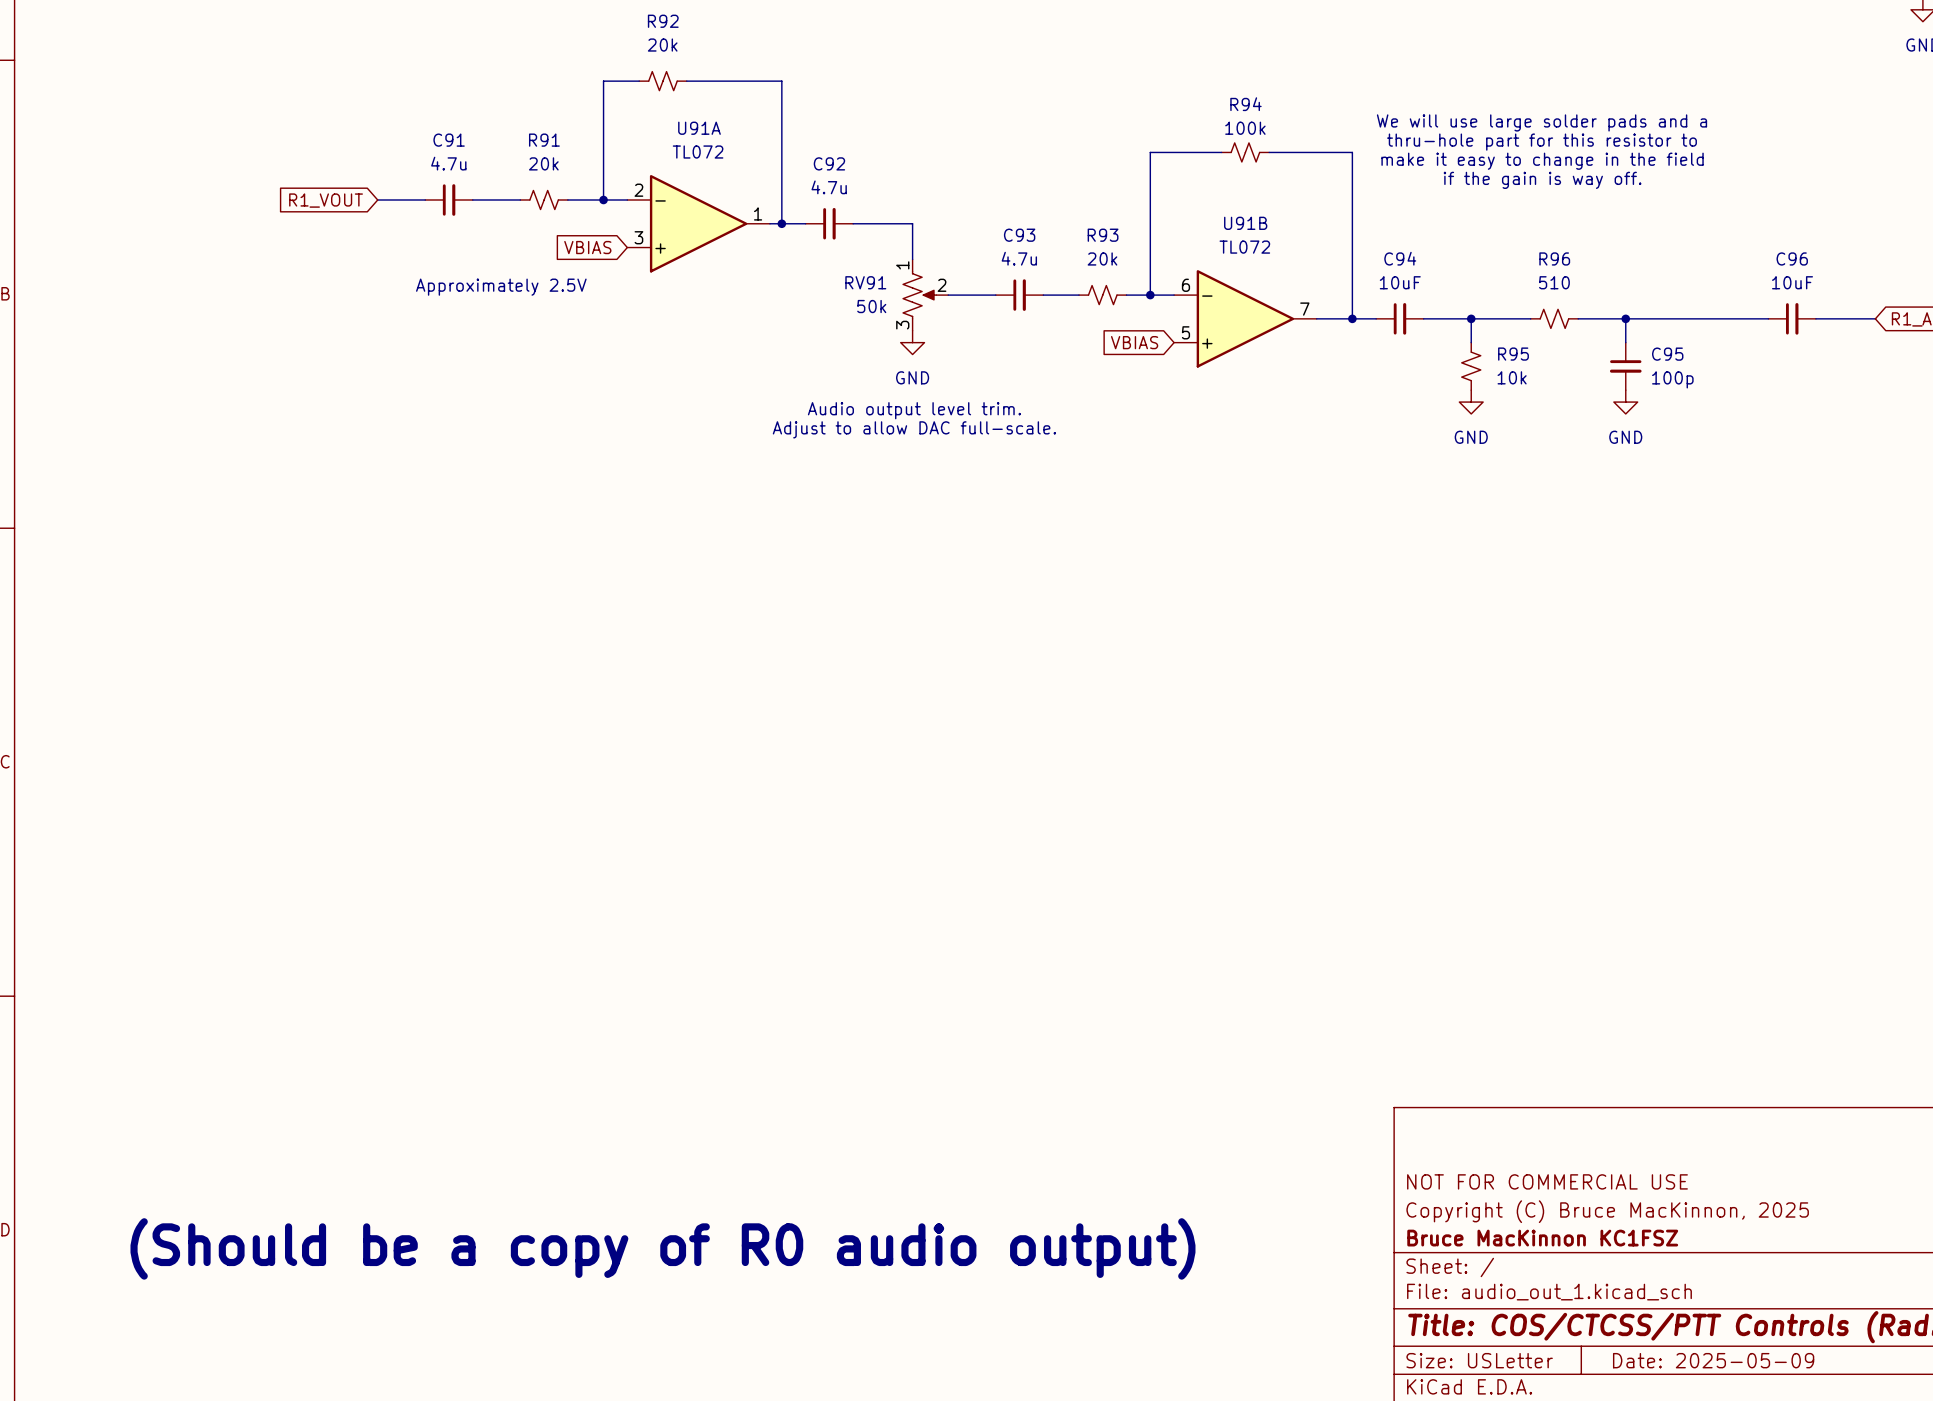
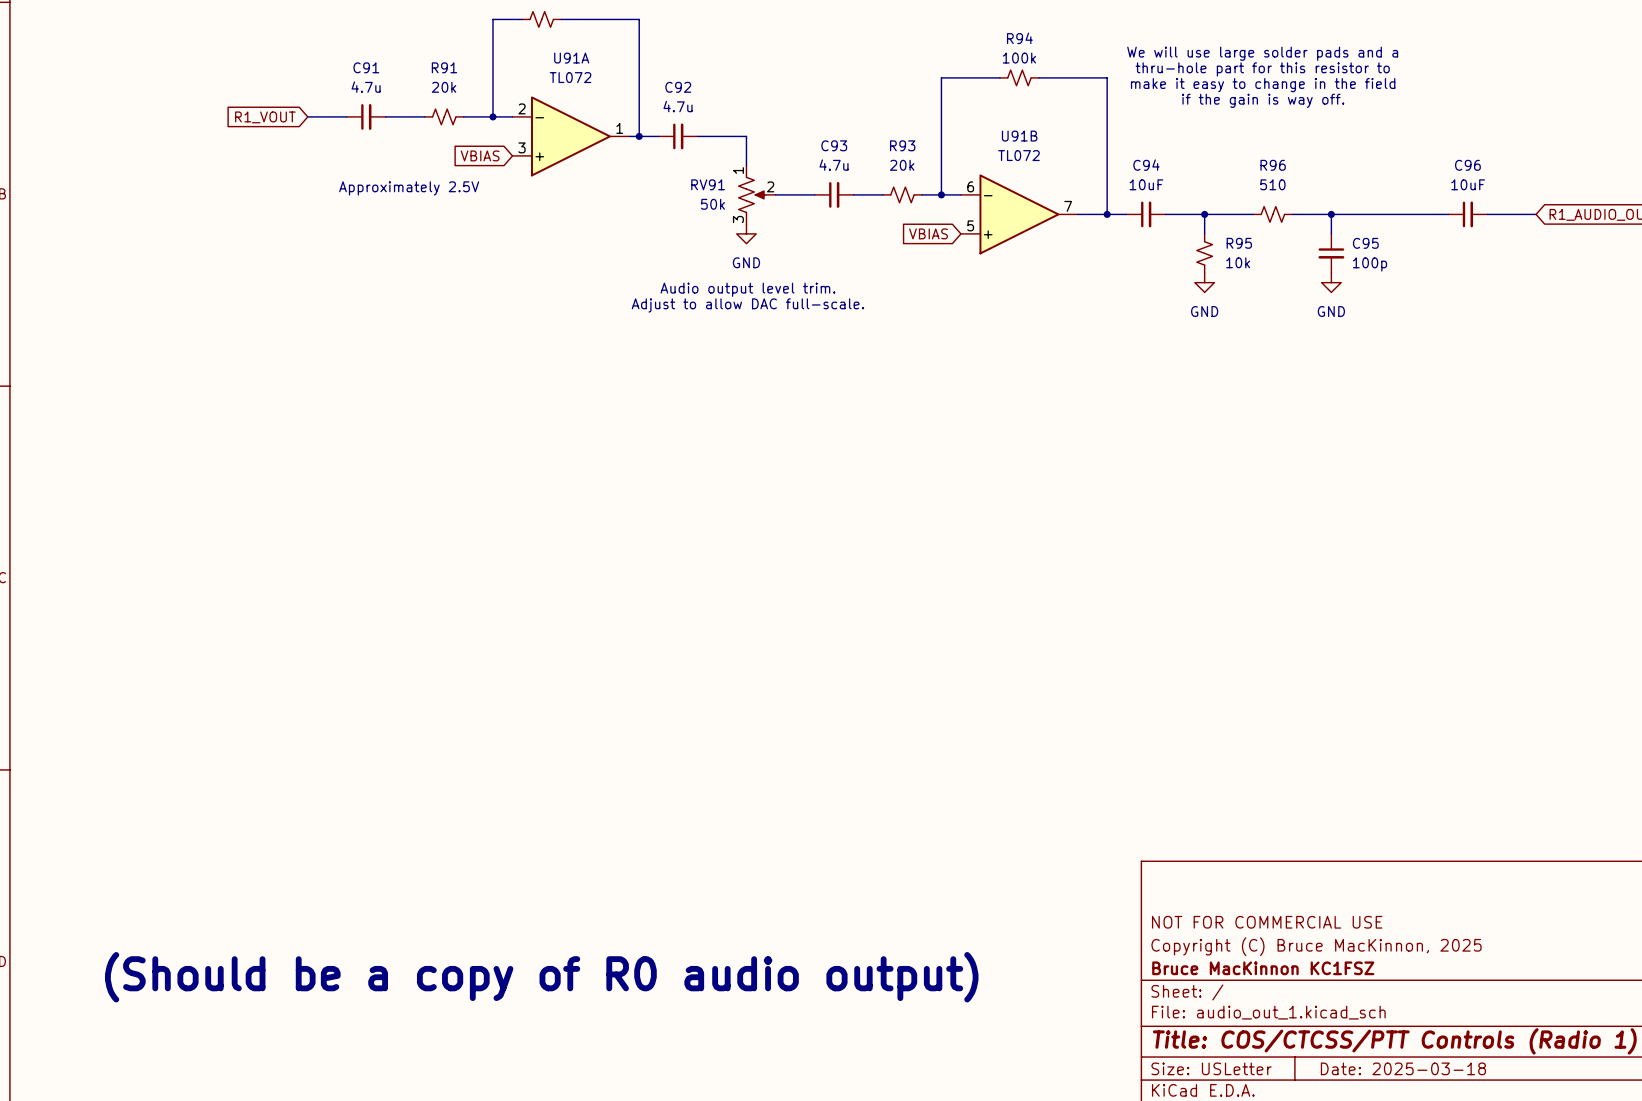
title block: Date: 2025-05-09 (1713, 1360) -> Date: 2025-03-18 (1403, 1068)

